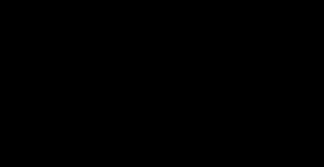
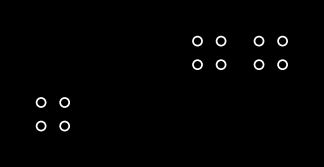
part: none -> (209, 52)
part: none -> (270, 52)
part: none -> (52, 114)

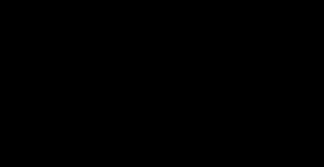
part: (209, 52) -> none
part: (270, 52) -> none
part: (52, 114) -> none

